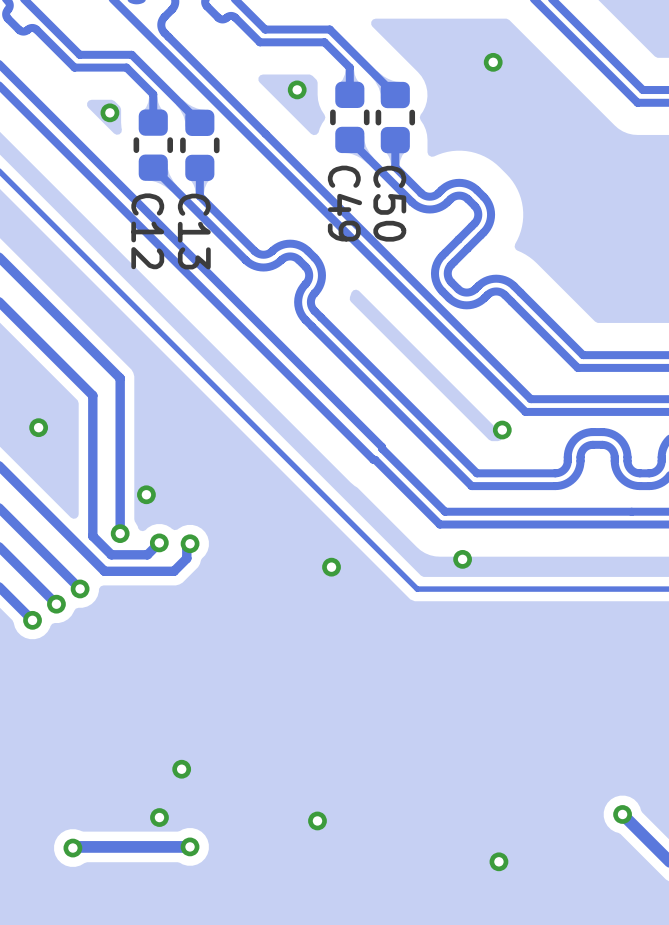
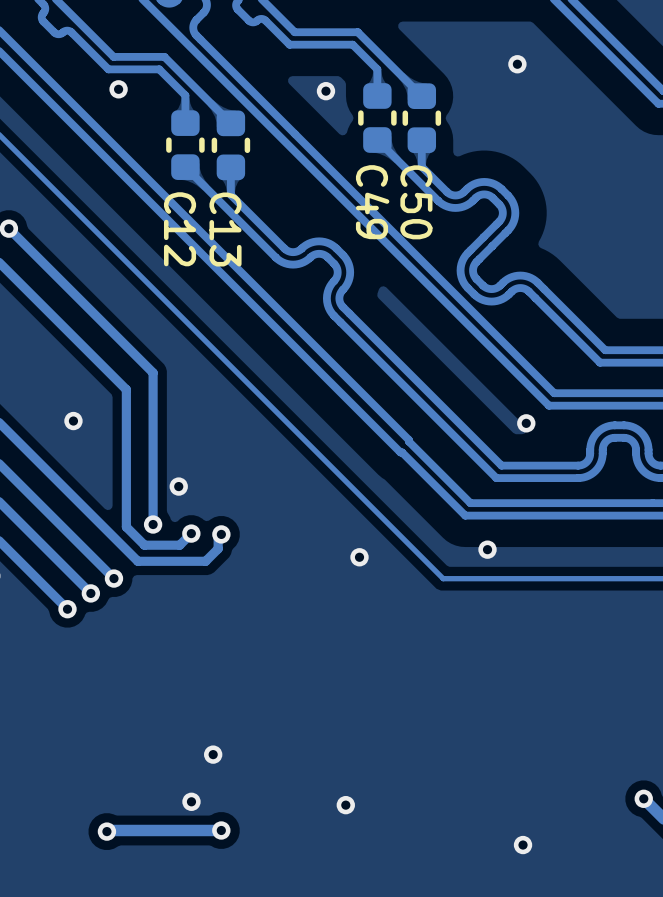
via position: (109, 112) -> (118, 89)

